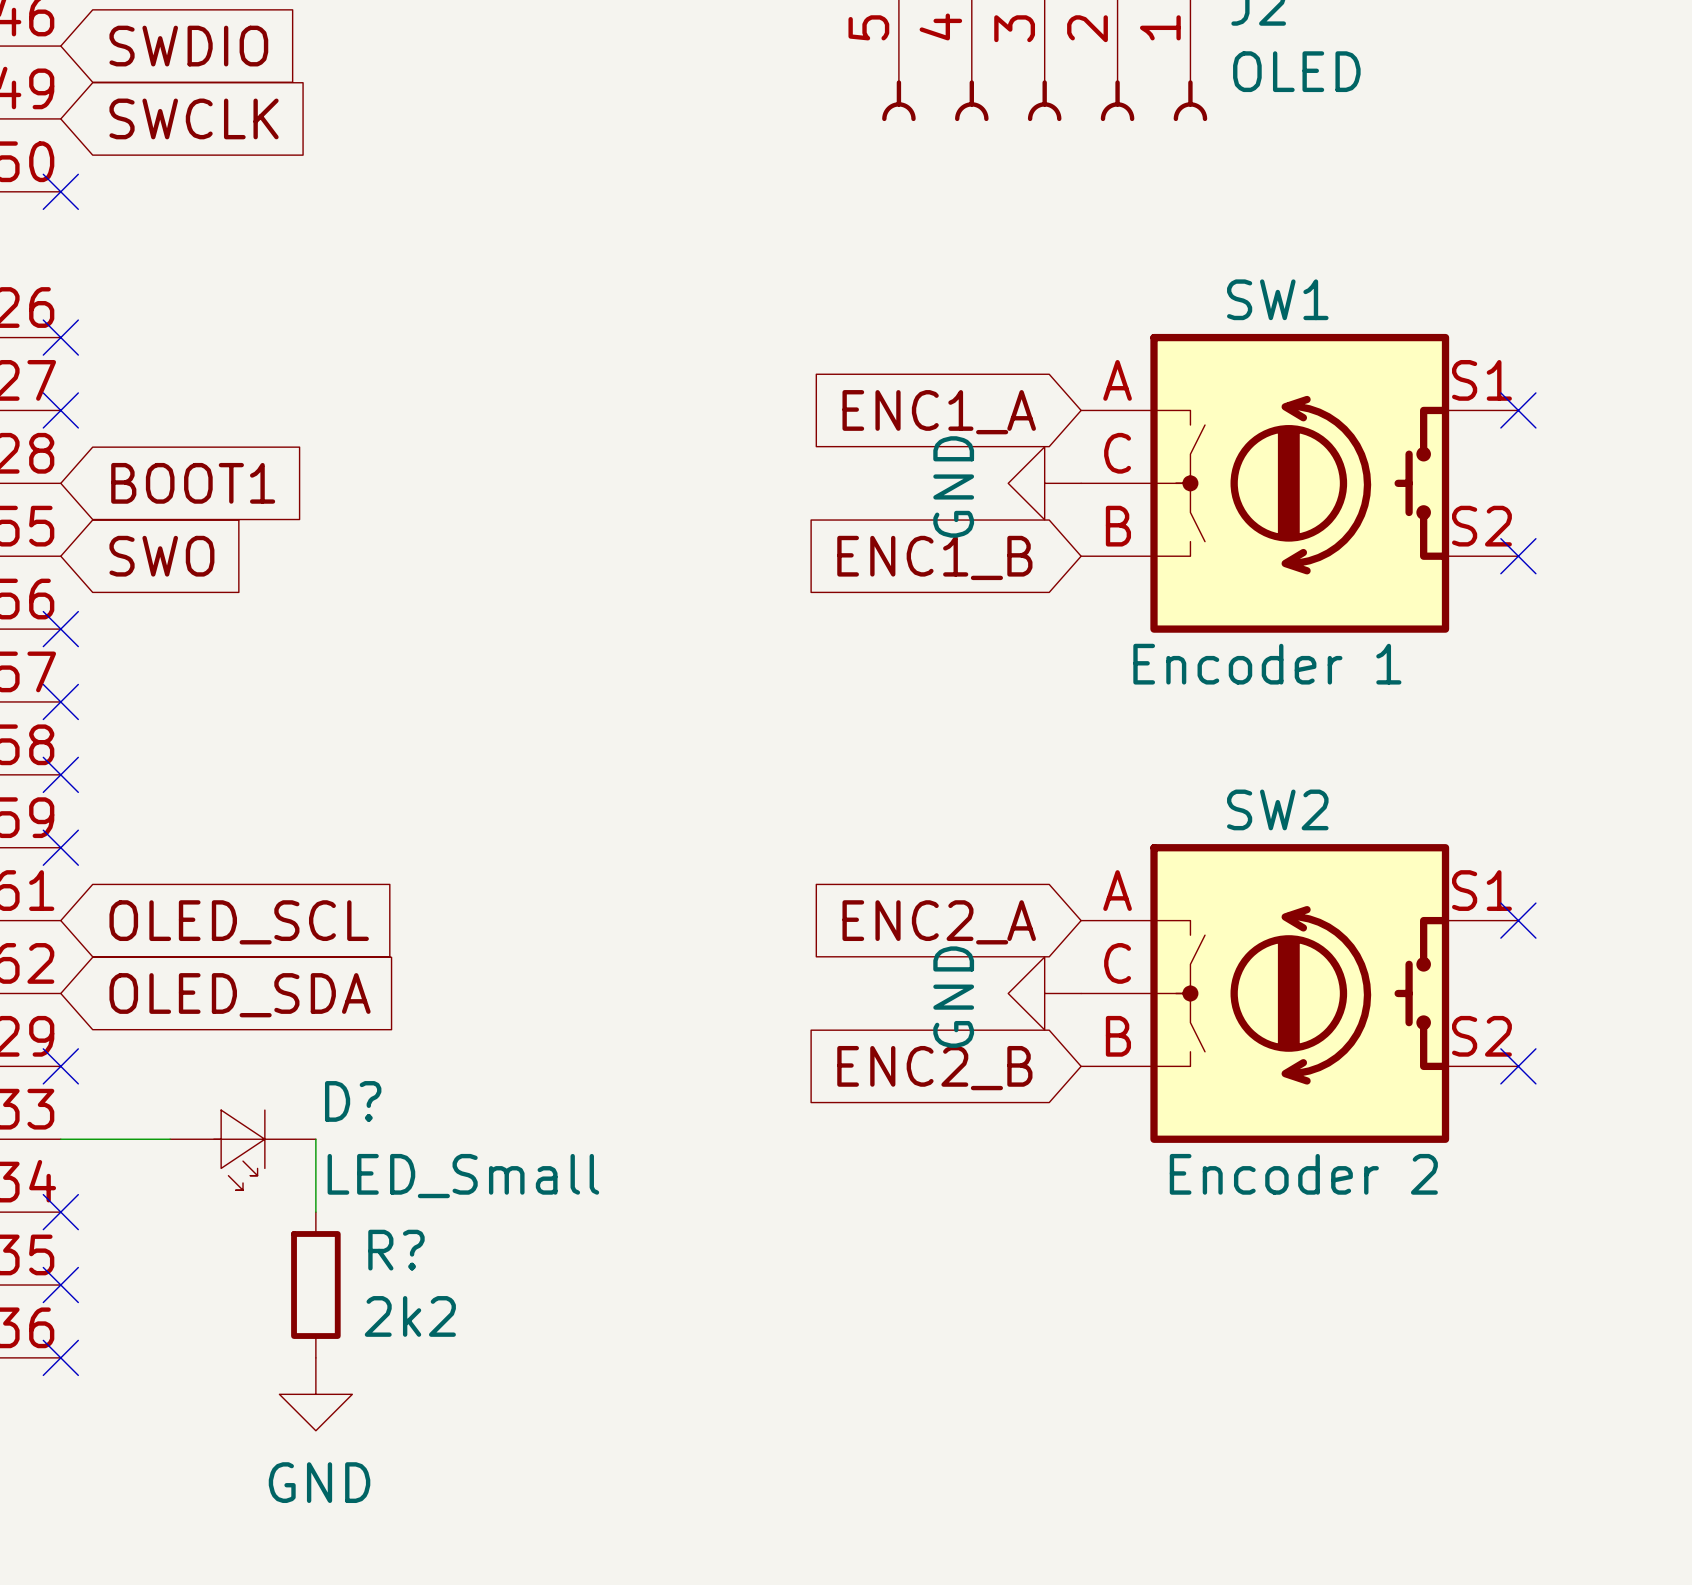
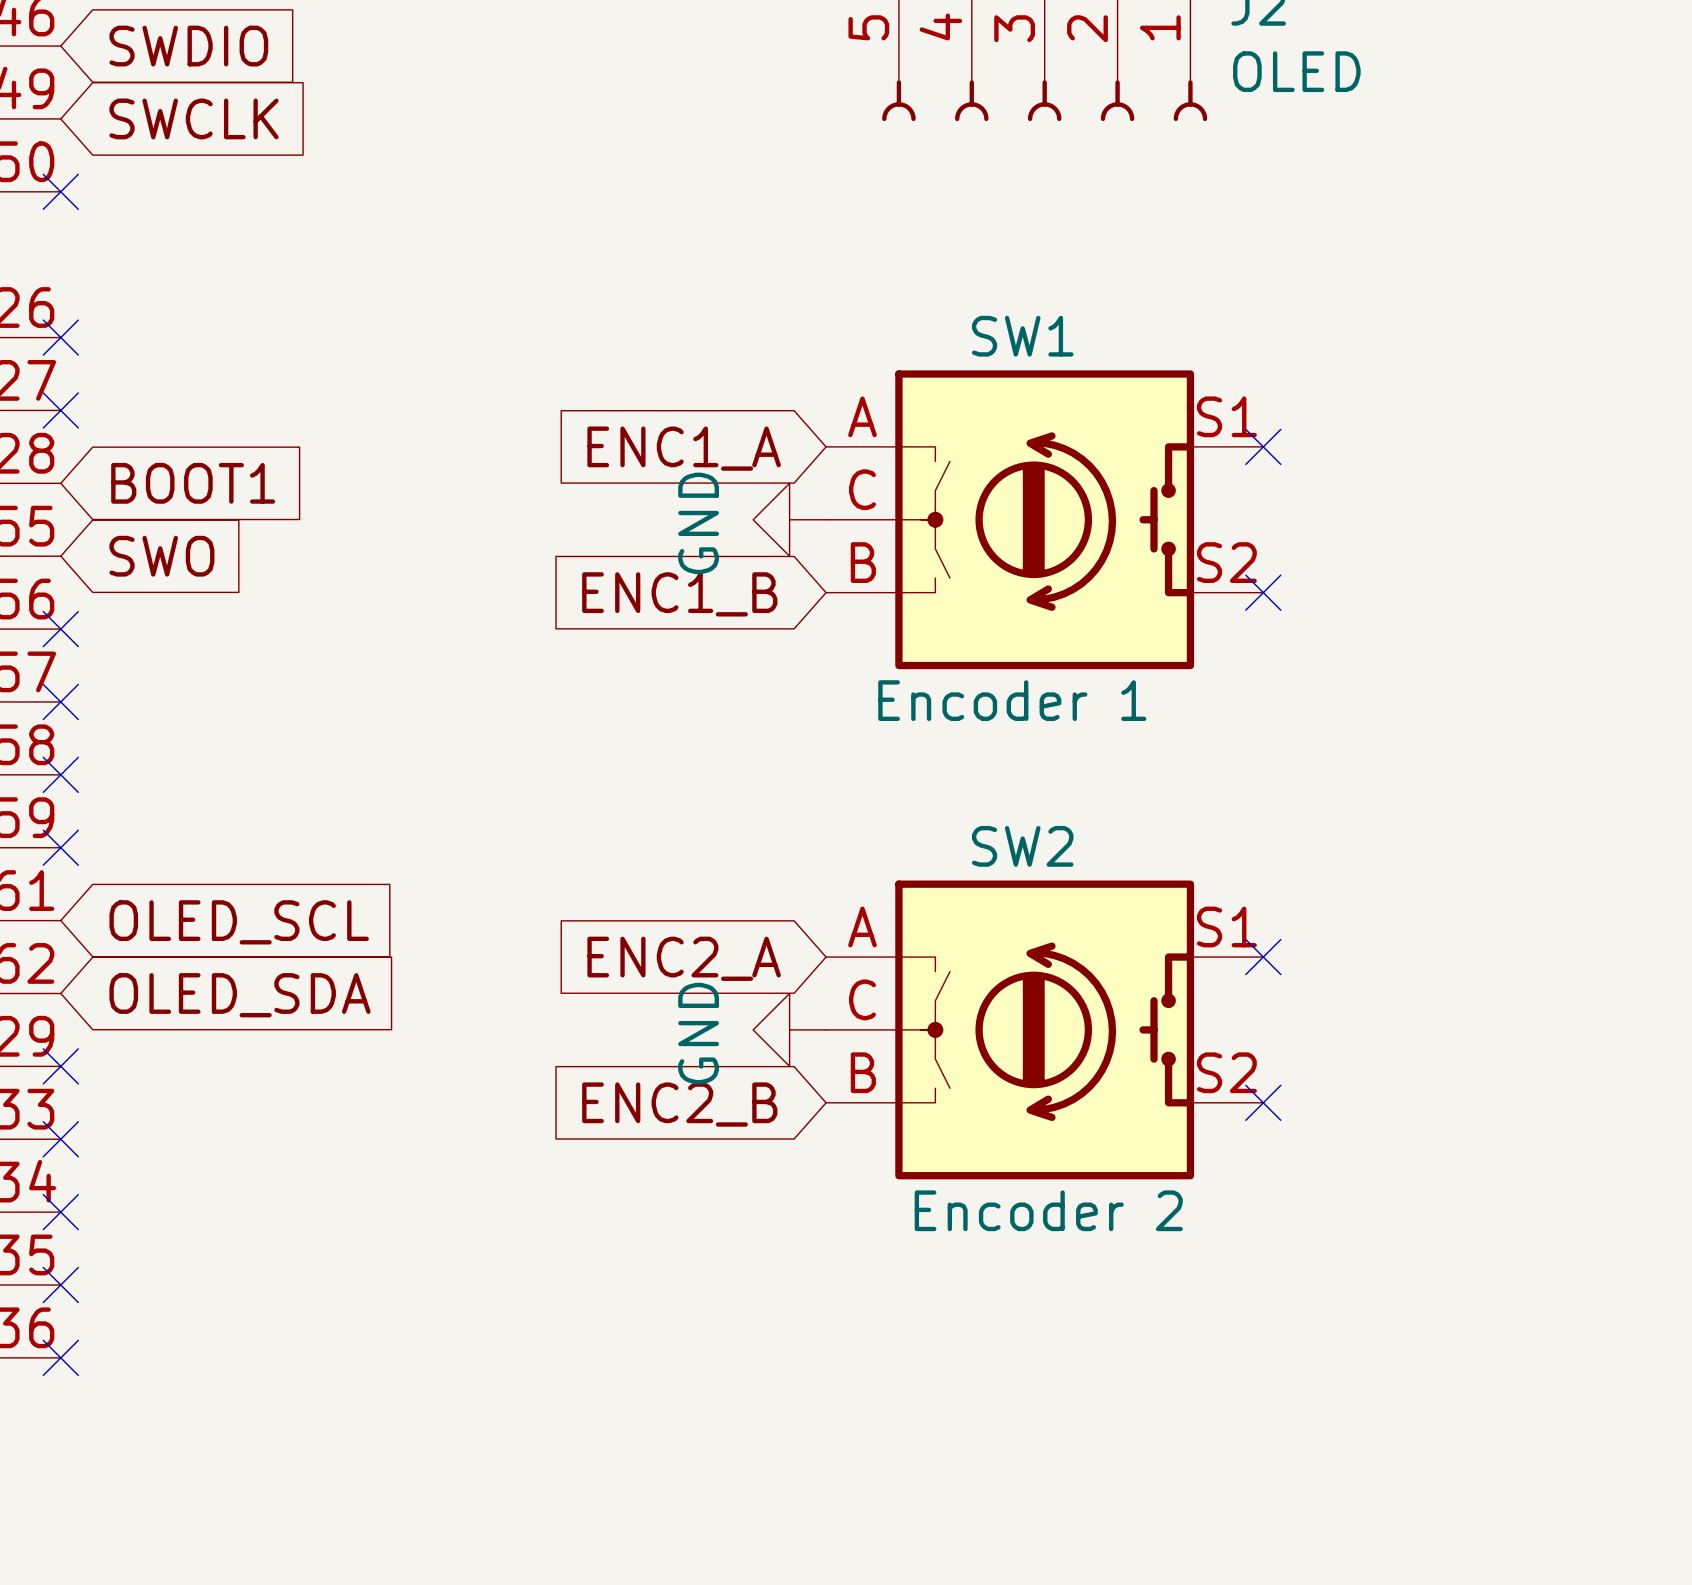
no-connect mark: (1518, 410) -> none
global label position: ENC1_A (939, 412) -> ENC1_A (684, 448)
no-connect mark: none -> (1263, 446)
power symbol position: GND (1044, 483) -> GND (789, 519)
SW1 position: (1299, 483) -> (1044, 519)
no-connect mark: (1518, 556) -> none
global label position: ENC1_B (934, 557) -> ENC1_B (679, 594)
no-connect mark: none -> (1263, 592)
no-connect mark: (1518, 920) -> none
global label position: ENC2_A (939, 922) -> ENC2_A (684, 958)
no-connect mark: none -> (1263, 957)
power symbol position: GND (1044, 993) -> GND (789, 1029)
SW2 position: (1299, 993) -> (1044, 1029)
no-connect mark: (1518, 1066) -> none
global label position: ENC2_B (934, 1068) -> ENC2_B (679, 1104)
no-connect mark: none -> (1263, 1102)
wire: (60, 1139) (170, 1139) -> none
no-connect mark: none -> (60, 1139)
wire: (315, 1139) (315, 1212) -> none
D?: LED_Small (243, 1150) -> none
R?: 2k2 (315, 1285) -> none
power symbol: GND (315, 1394) -> none

